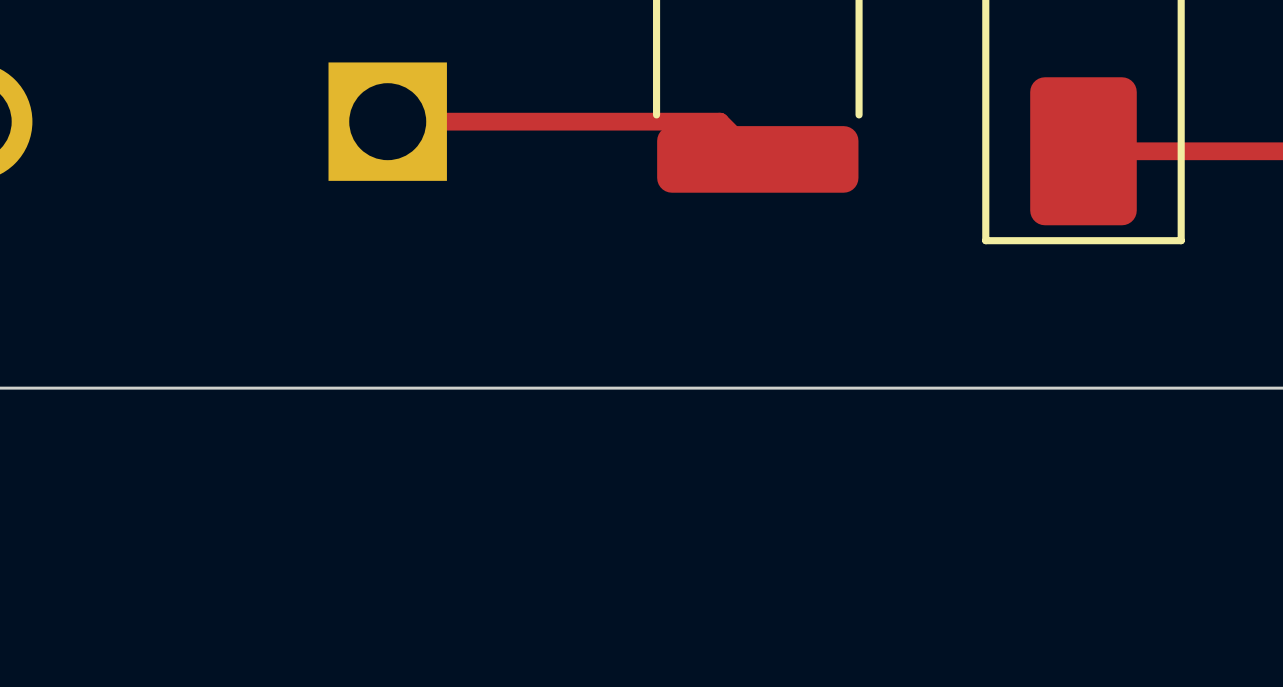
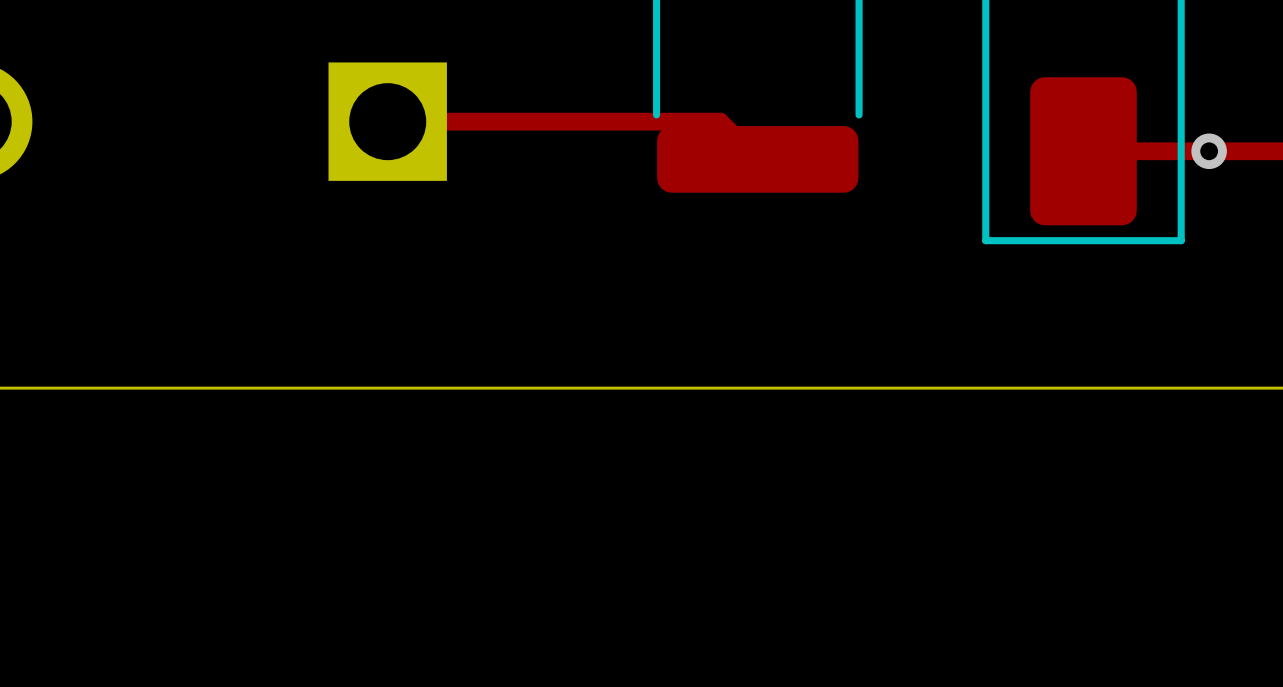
via: none -> (1209, 151)

